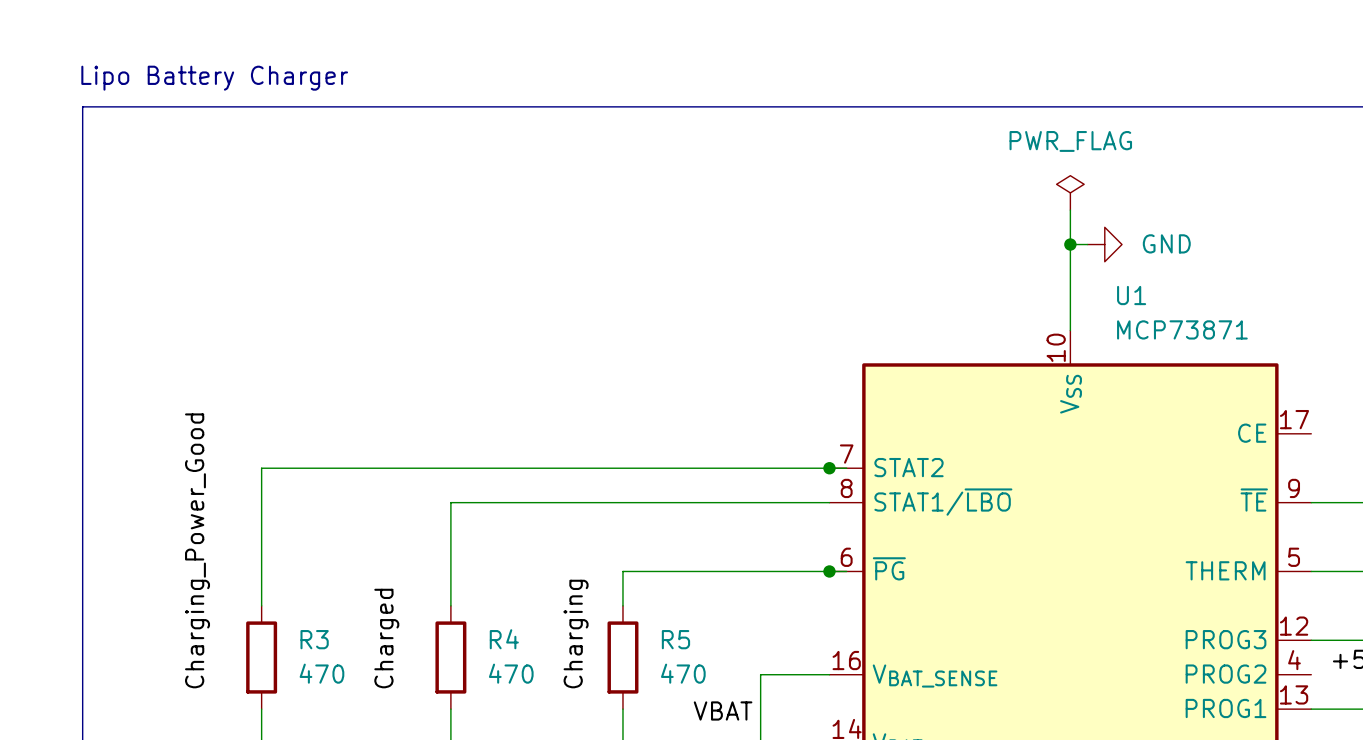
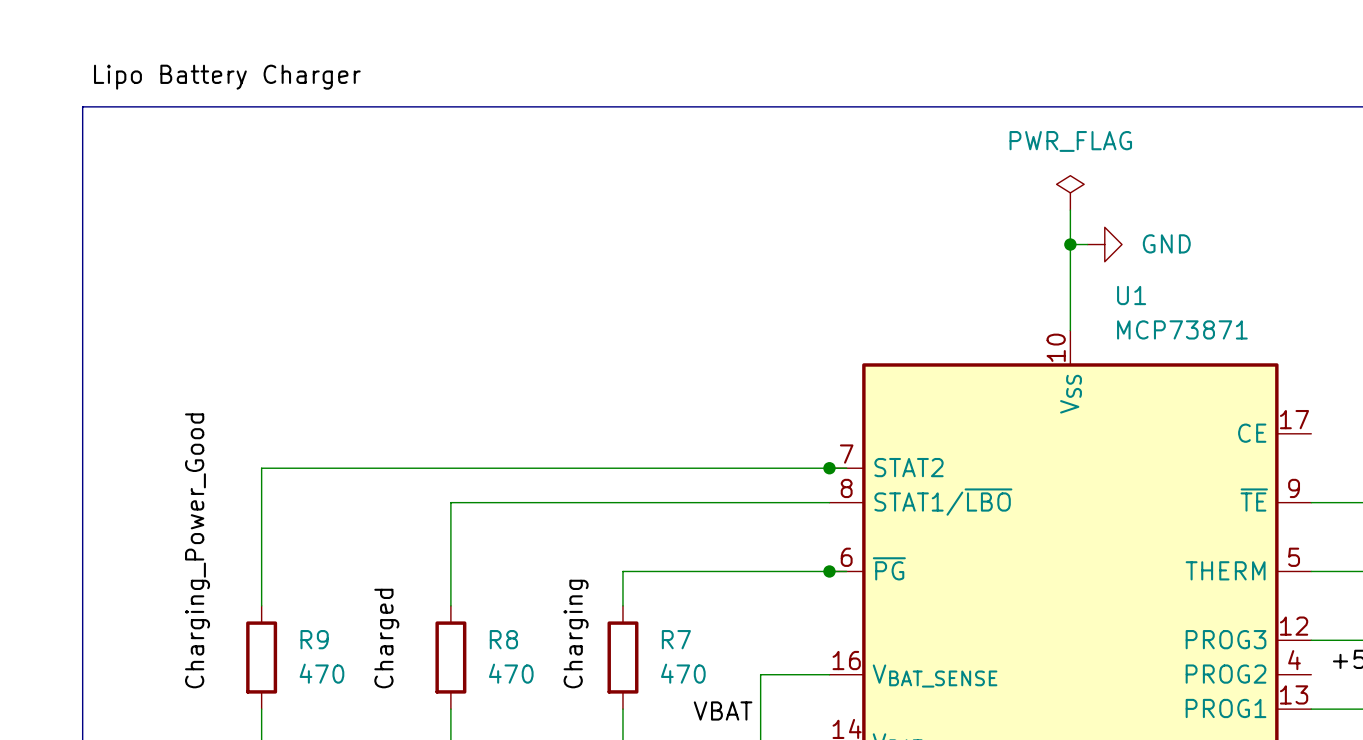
label: none -> Lipo Battery Charger (227, 77)
text: Lipo Battery Charger (214, 78) -> none
R3 name: R3 (314, 639) -> R9 (314, 639)
R4 name: R4 (504, 639) -> R8 (503, 639)
R5 name: R5 (675, 639) -> R7 (676, 639)

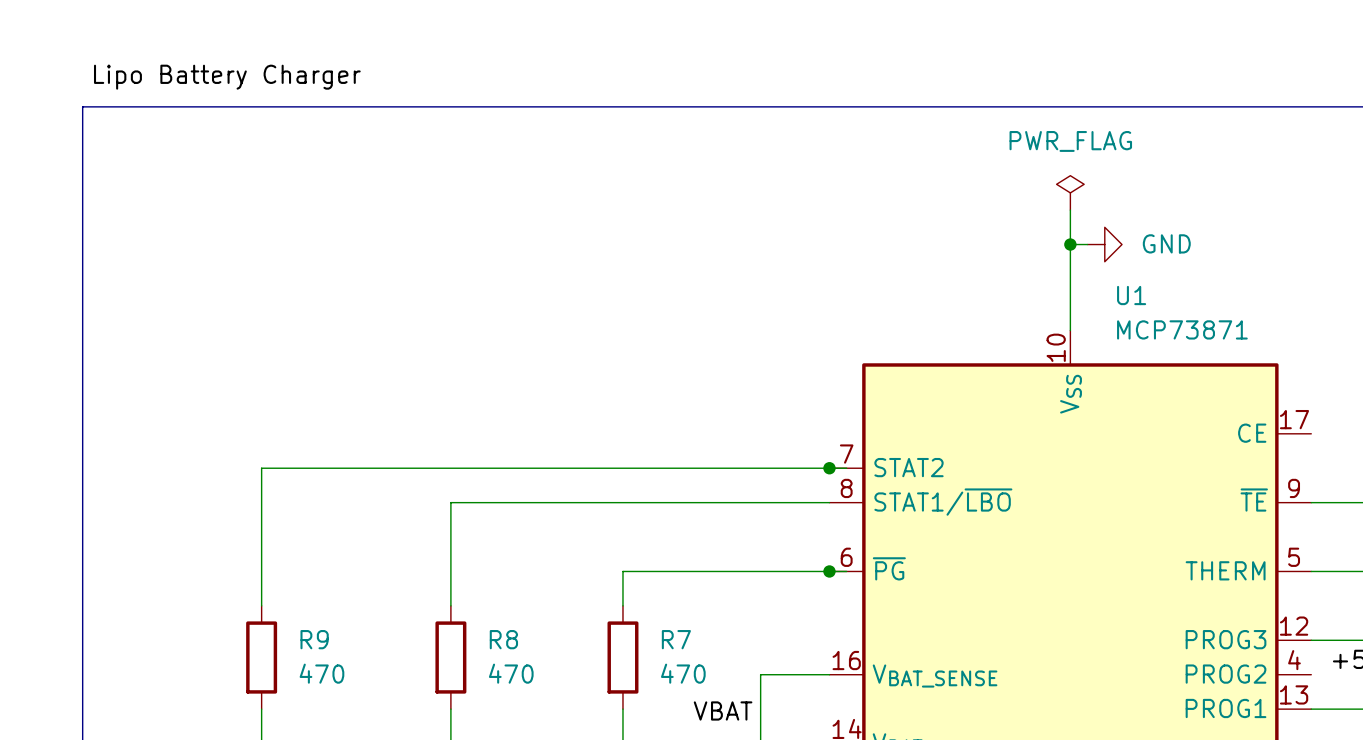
label: Charging_Power_Good (197, 550) -> none
label: Charging (576, 634) -> none
label: Charged (386, 638) -> none

